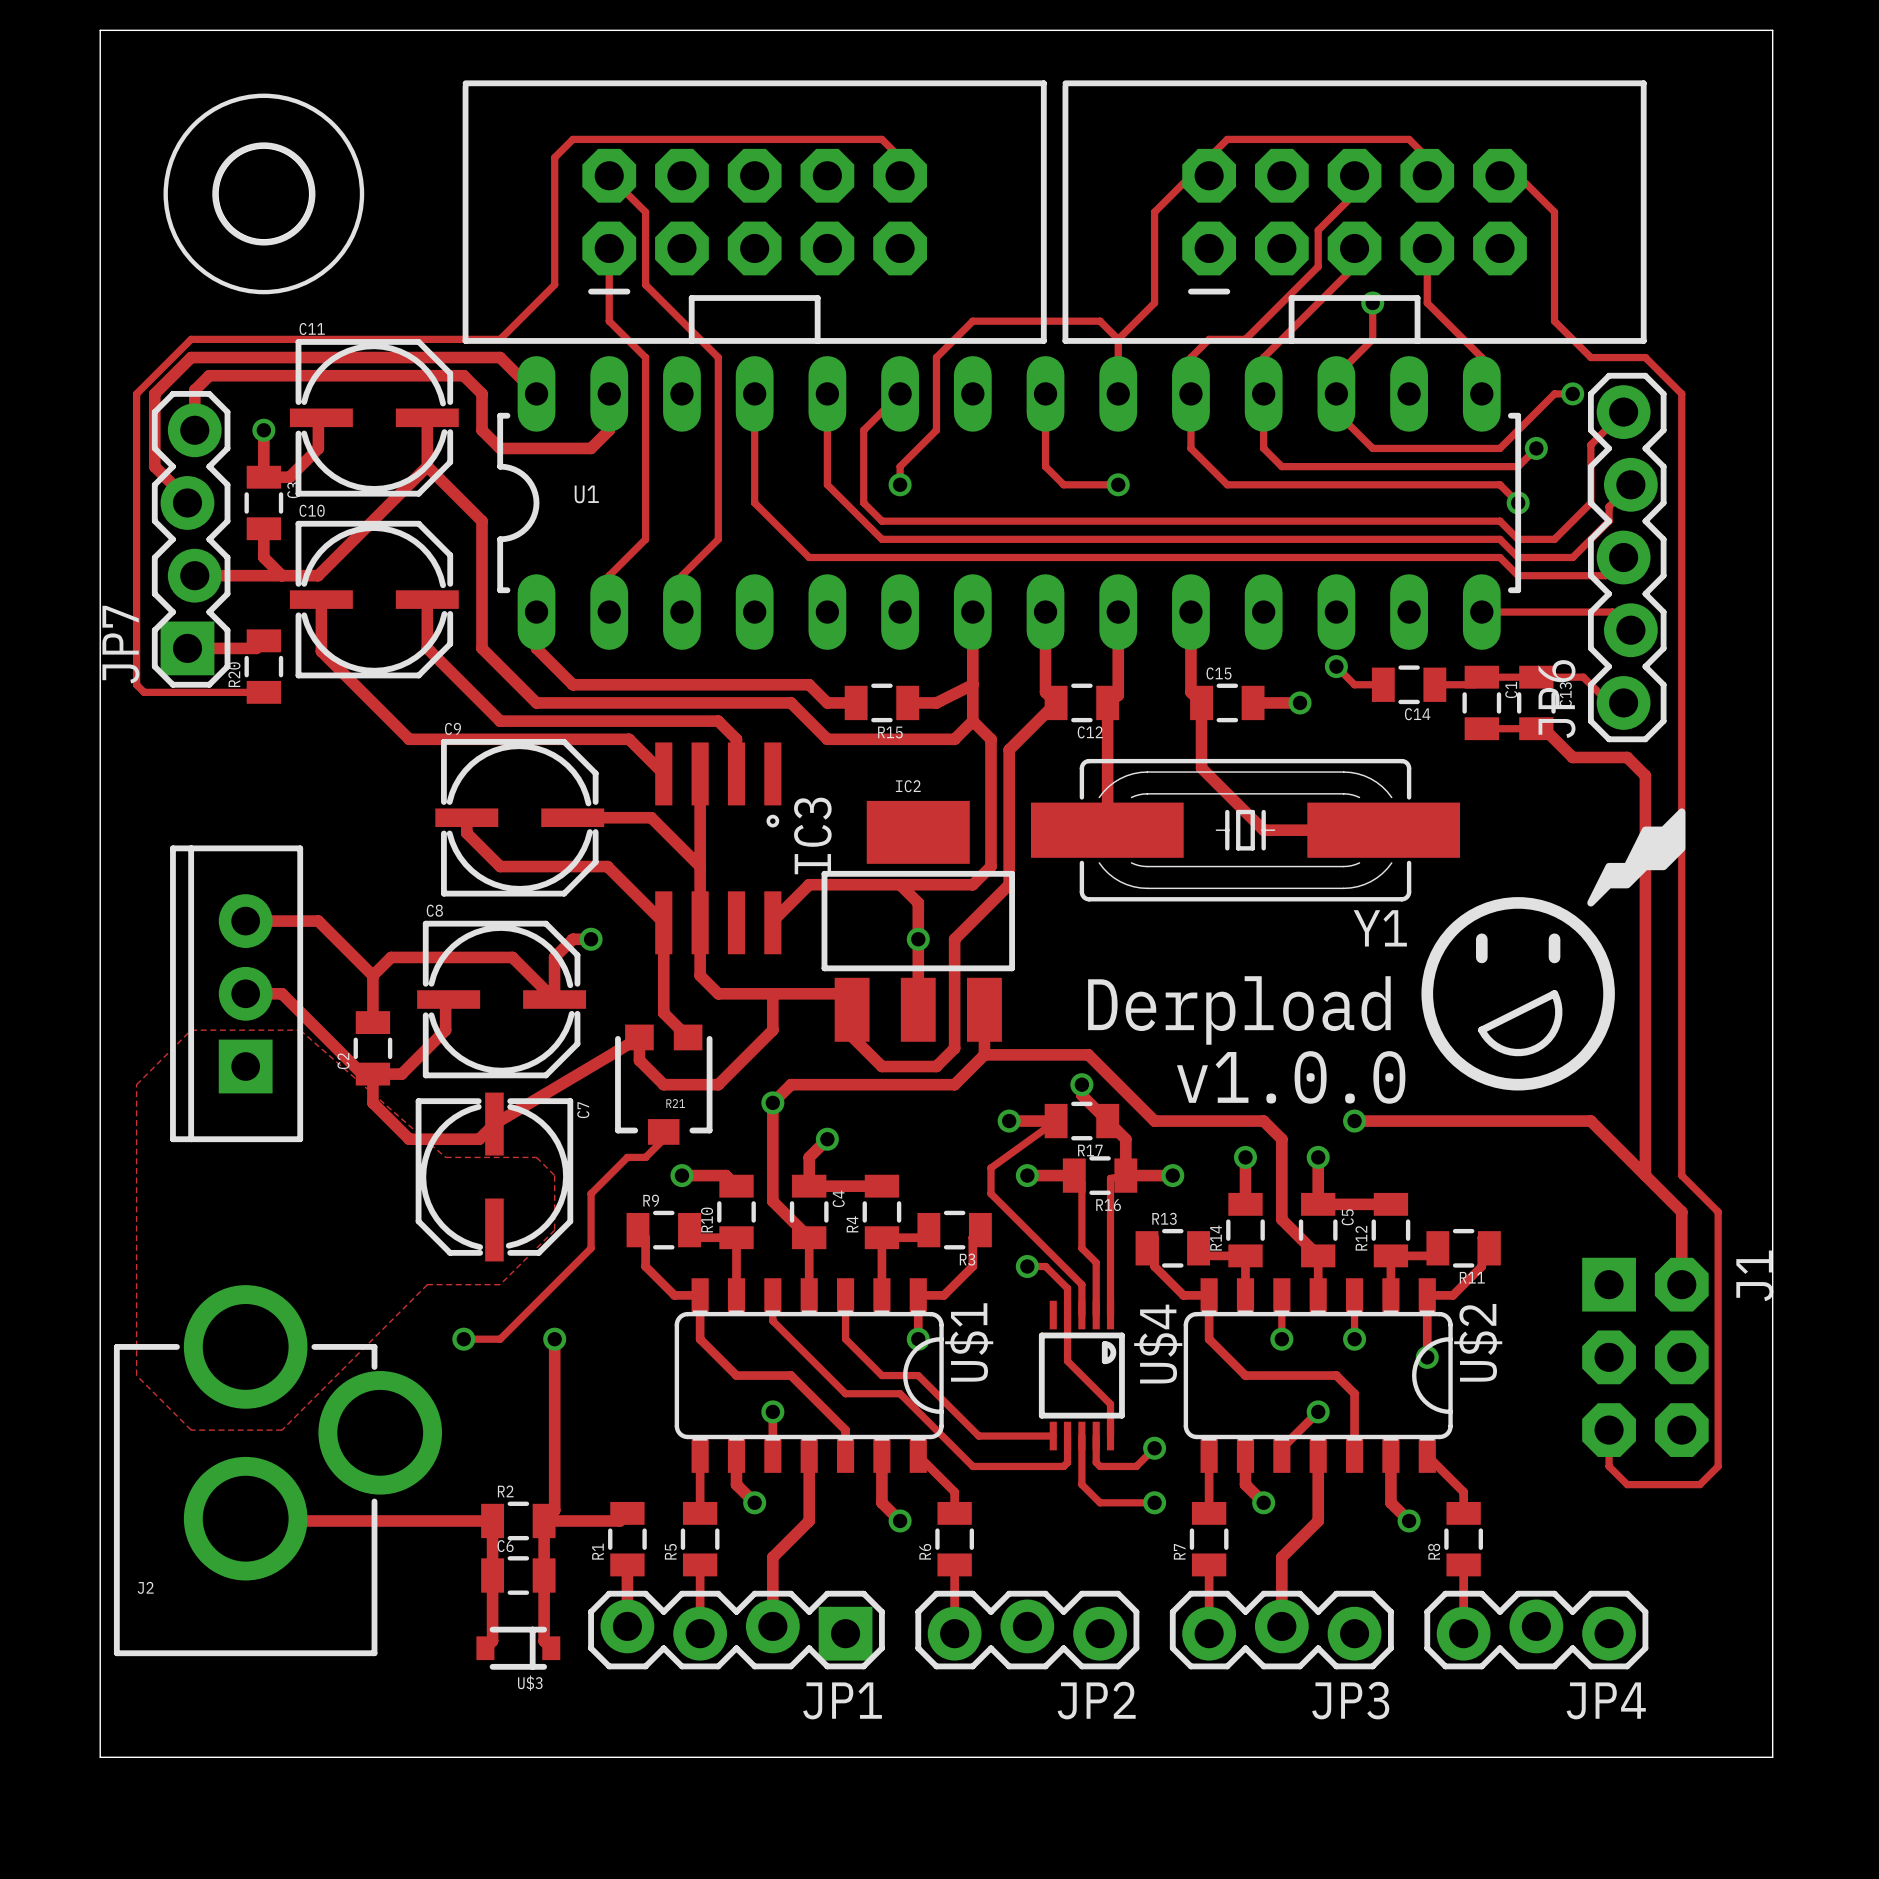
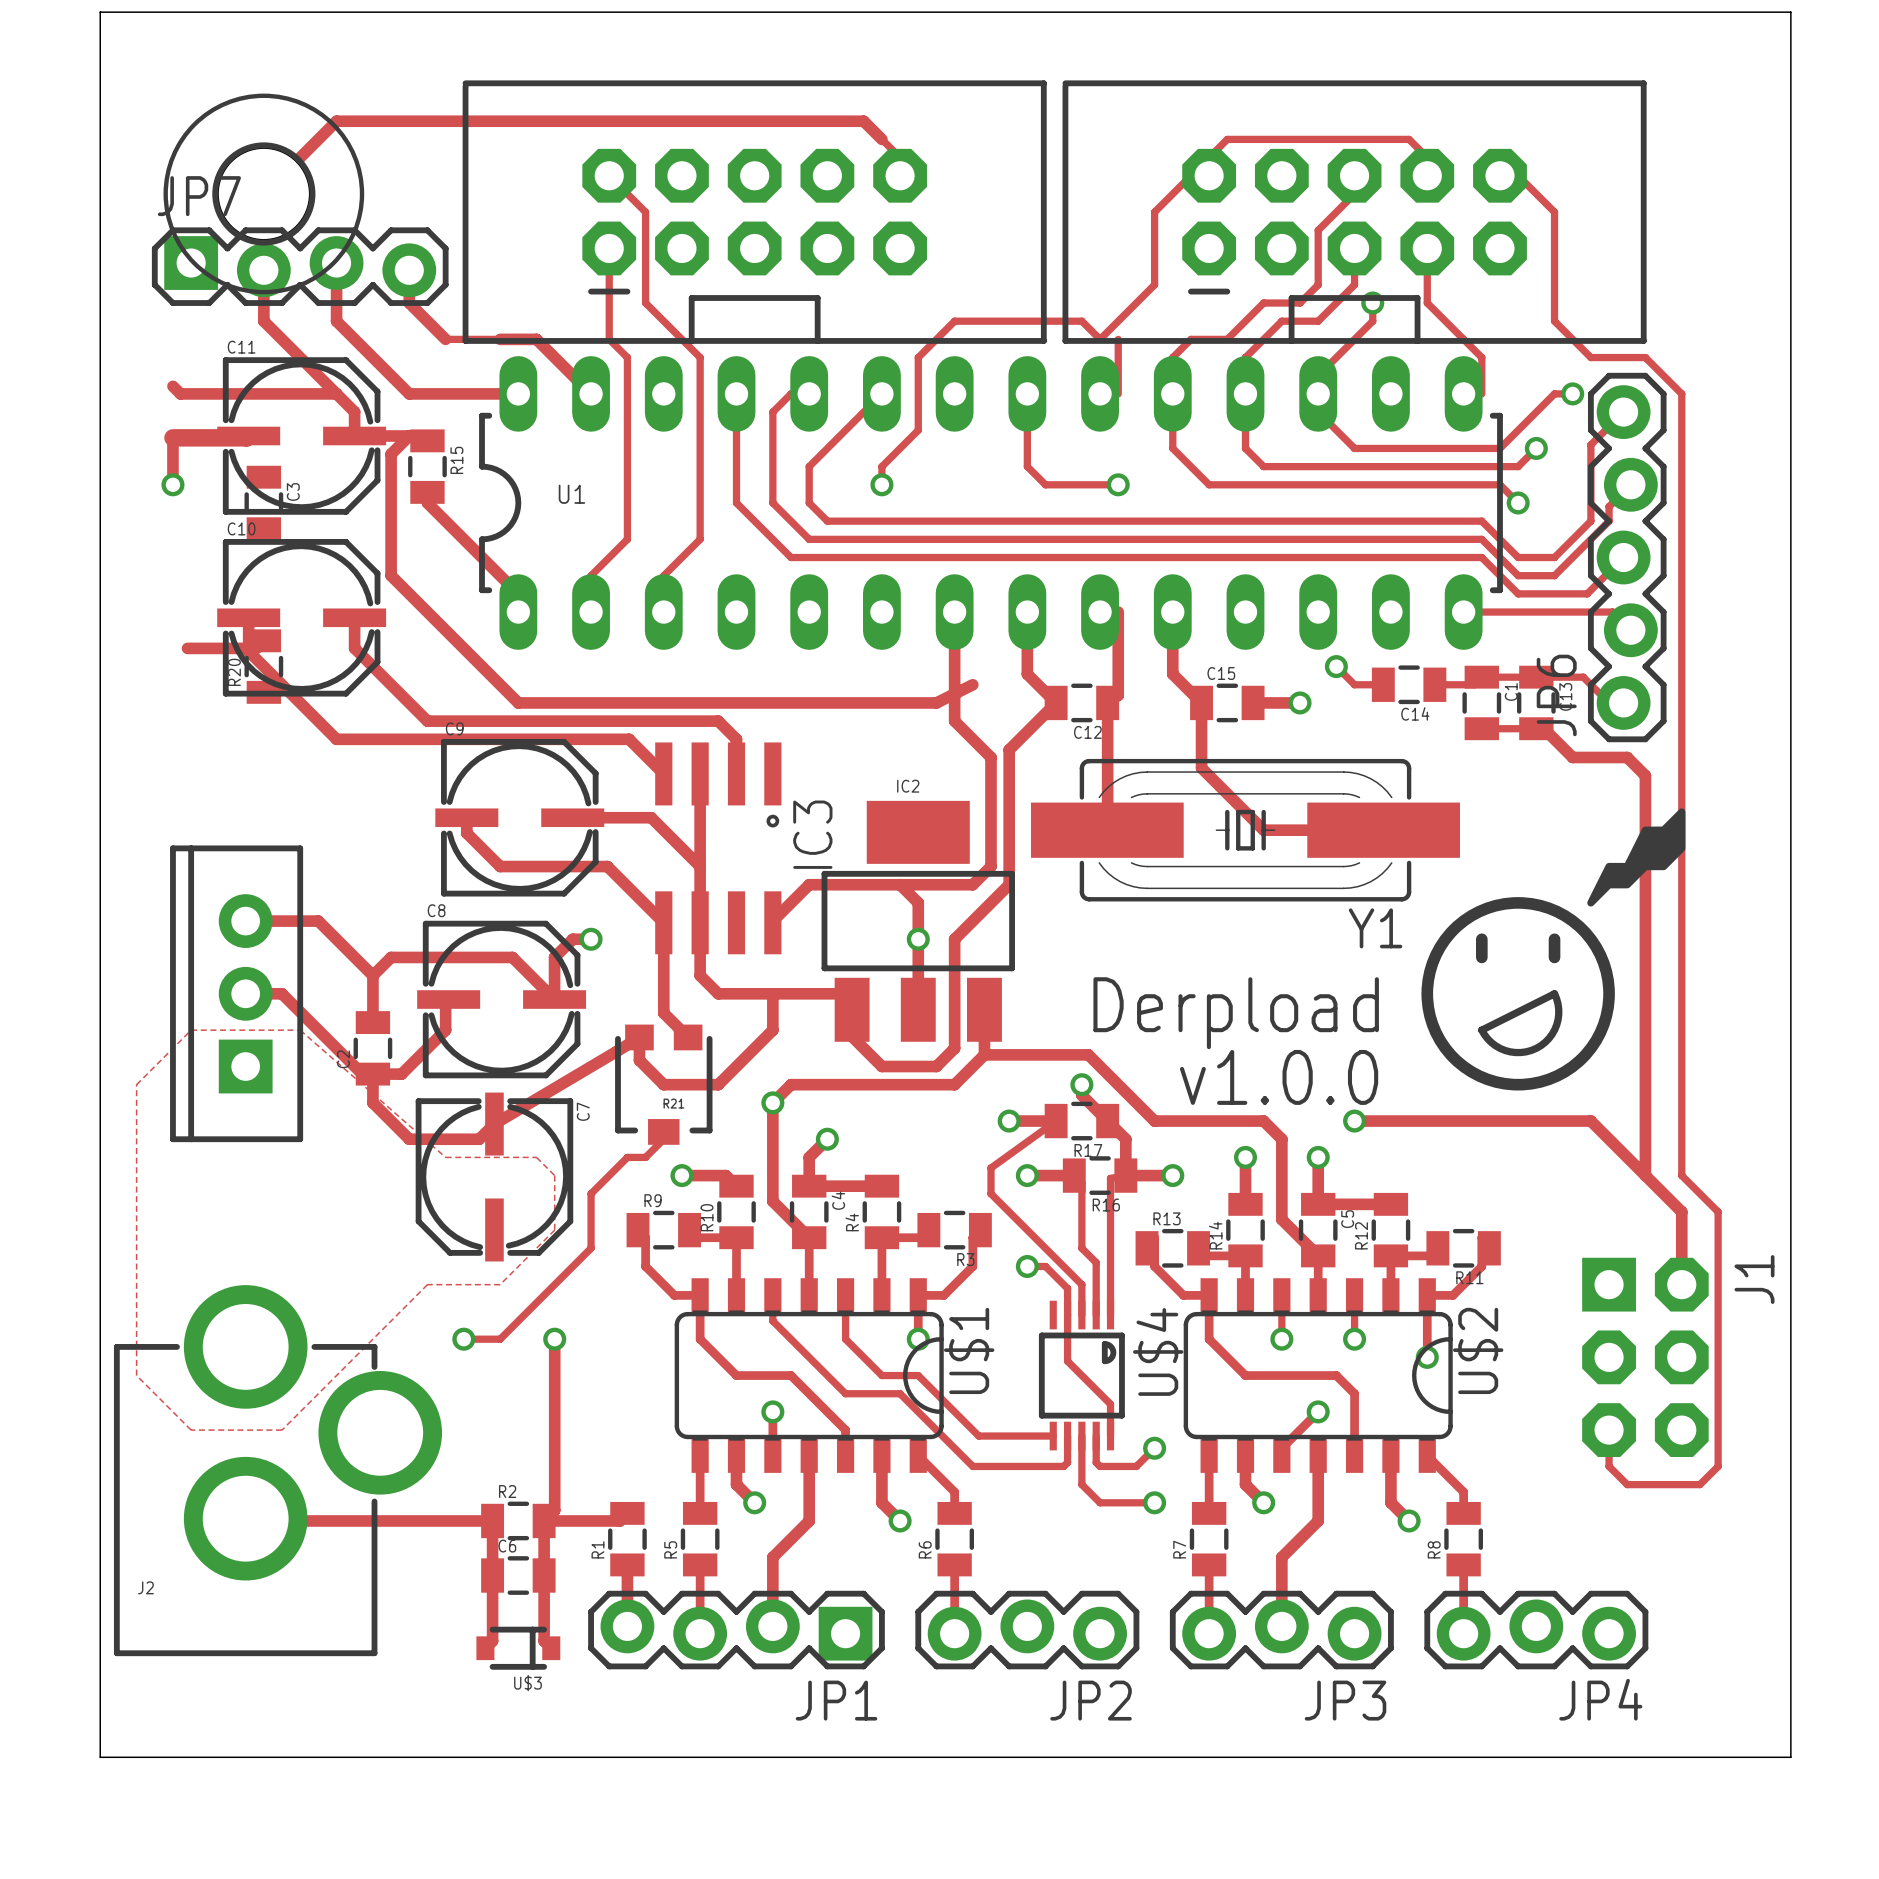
board edge: (100, 30) (1772, 30) (1772, 1757) -> (100, 30) (100, 12) (1790, 12) (1790, 1757) (1772, 1757)
track: (881, 139) (572, 139) (554, 157) (554, 284) (500, 339) -> (881, 139) (863, 121) (336, 121) (289, 168) (289, 193)
track: none -> (336, 263) (336, 321) (409, 393) (518, 393)
track: (1318, 266) (1245, 339) (1227, 339) -> (1318, 266) (1318, 284) (1300, 303) (1263, 303) (1227, 339)
track: (1354, 266) (1263, 357) (1263, 448) (1281, 466) -> (1354, 266) (1354, 284) (1318, 321) (1281, 321) (1245, 357) (1245, 448) (1263, 466) (1281, 466)
track: none -> (263, 270) (263, 321) (354, 411) (354, 435) (422, 435) (427, 440)
track: (645, 284) (718, 357) (718, 539) (681, 575) (681, 612) -> (645, 284) (645, 303) (700, 357) (700, 539) (663, 575) (663, 612)
track: (1154, 284) (1154, 303) (1118, 339) (1100, 321) (1081, 321) -> (1154, 284) (1100, 339) (1081, 321)
track: (609, 321) (645, 357) (645, 539) (609, 575) (609, 612) -> (609, 321) (609, 339) (627, 357) (627, 539) (591, 575) (591, 612)
track: (972, 321) (936, 357) (936, 430) (900, 466) (900, 484) -> (972, 321) (954, 321) (918, 357) (918, 430) (881, 466) (881, 484)
track: (1372, 321) (1372, 339) (1336, 375) (1336, 412) (1372, 448) -> (1372, 321) (1318, 375) (1318, 412) (1354, 448) (1372, 448)
track: (445, 339) (191, 339) (136, 393) (136, 684) (144, 692) (263, 692) -> (445, 339) (409, 303) (409, 270)
track: none -> (500, 339) (536, 339) (591, 393)
track: (1209, 339) (1190, 357) (1190, 448) (1227, 484) -> (1209, 339) (1190, 339) (1172, 357) (1172, 448) (1209, 484) (1227, 484)
track: none -> (172, 386) (180, 393) (336, 393)
track: (536, 393) (500, 357) (191, 357) (154, 393) (154, 466) (187, 499) (187, 502) -> none
track: (609, 393) (609, 430) (591, 448) (500, 448) (481, 430) (481, 393) (463, 375) (209, 375) (194, 390) (194, 430) -> none
track: (754, 393) (754, 502) (809, 557) -> (736, 393) (736, 502) (791, 557) (809, 557)
track: (827, 393) (827, 484) (881, 539) -> (809, 393) (791, 393) (772, 412) (772, 502) (809, 539) (881, 539)
track: (900, 393) (863, 430) (863, 502) (881, 521) -> (881, 393) (809, 466) (809, 502) (827, 521) (881, 521)
track: (1045, 393) (1045, 466) (1063, 484) -> (1027, 393) (1027, 466) (1045, 484) (1063, 484)
track: (321, 417) (318, 420) (318, 448) (289, 477) (263, 477) (263, 430) -> none
C11 position: (374, 417) -> (301, 435)
track: (427, 417) (427, 466) -> none
via position: (263, 430) -> (172, 484)
track: none -> (248, 435) (246, 437) (172, 437) (172, 484)
track: (427, 466) (481, 521) (481, 648) (536, 702) -> (409, 435) (391, 454) (391, 575) (518, 702) (536, 702)
track: (427, 466) (318, 575) (194, 575) -> none
via position: (900, 484) -> (881, 484)
track: none -> (427, 492) (427, 502) (518, 593) (518, 612)
U1 position: (1009, 502) -> (990, 502)
track: (1590, 502) (1554, 539) (1518, 539) (1499, 521) (1481, 521) -> (1590, 502) (1590, 521) (1554, 557)
track: (263, 528) (263, 557) (282, 575) -> none
JP7 rotation: 0° (191, 539) -> 90° clockwise (300, 266)
JP7 position: (191, 539) -> (300, 266)
track: (1481, 539) (1499, 539) -> (1481, 521) (1499, 539)
track: (1481, 557) (1499, 557) -> (1481, 539) (1499, 557)
track: (1554, 557) (1572, 557) -> (1554, 575) (1572, 557)
track: (1554, 575) (1605, 575) -> (1481, 557) (1518, 593) (1587, 593) (1605, 575)
track: (321, 599) (321, 651) (409, 739) -> (248, 617) (248, 651) (336, 739) (409, 739)
C10 position: (374, 599) -> (301, 617)
track: (427, 599) (427, 648) (500, 721) -> (354, 617) (354, 648) (427, 721) (500, 721)
track: (536, 612) (536, 648) (572, 684) (809, 684) (827, 702) -> none
track: (972, 612) (972, 721) -> none
track: (1045, 612) (1045, 692) -> (1027, 612) (1027, 674) (1045, 692)
track: (1190, 612) (1190, 692) -> (1172, 612) (1172, 674) (1190, 692)
track: (791, 702) (827, 739) (954, 739) (972, 721) -> (791, 702) (827, 702)
track: none -> (856, 702) (907, 702)
R15 rotation: 0° (881, 702) -> 90° clockwise (427, 466)
R15 position: (881, 702) -> (427, 466)
track: (972, 721) (990, 739) (990, 757) -> (954, 612) (954, 721) (990, 757)

